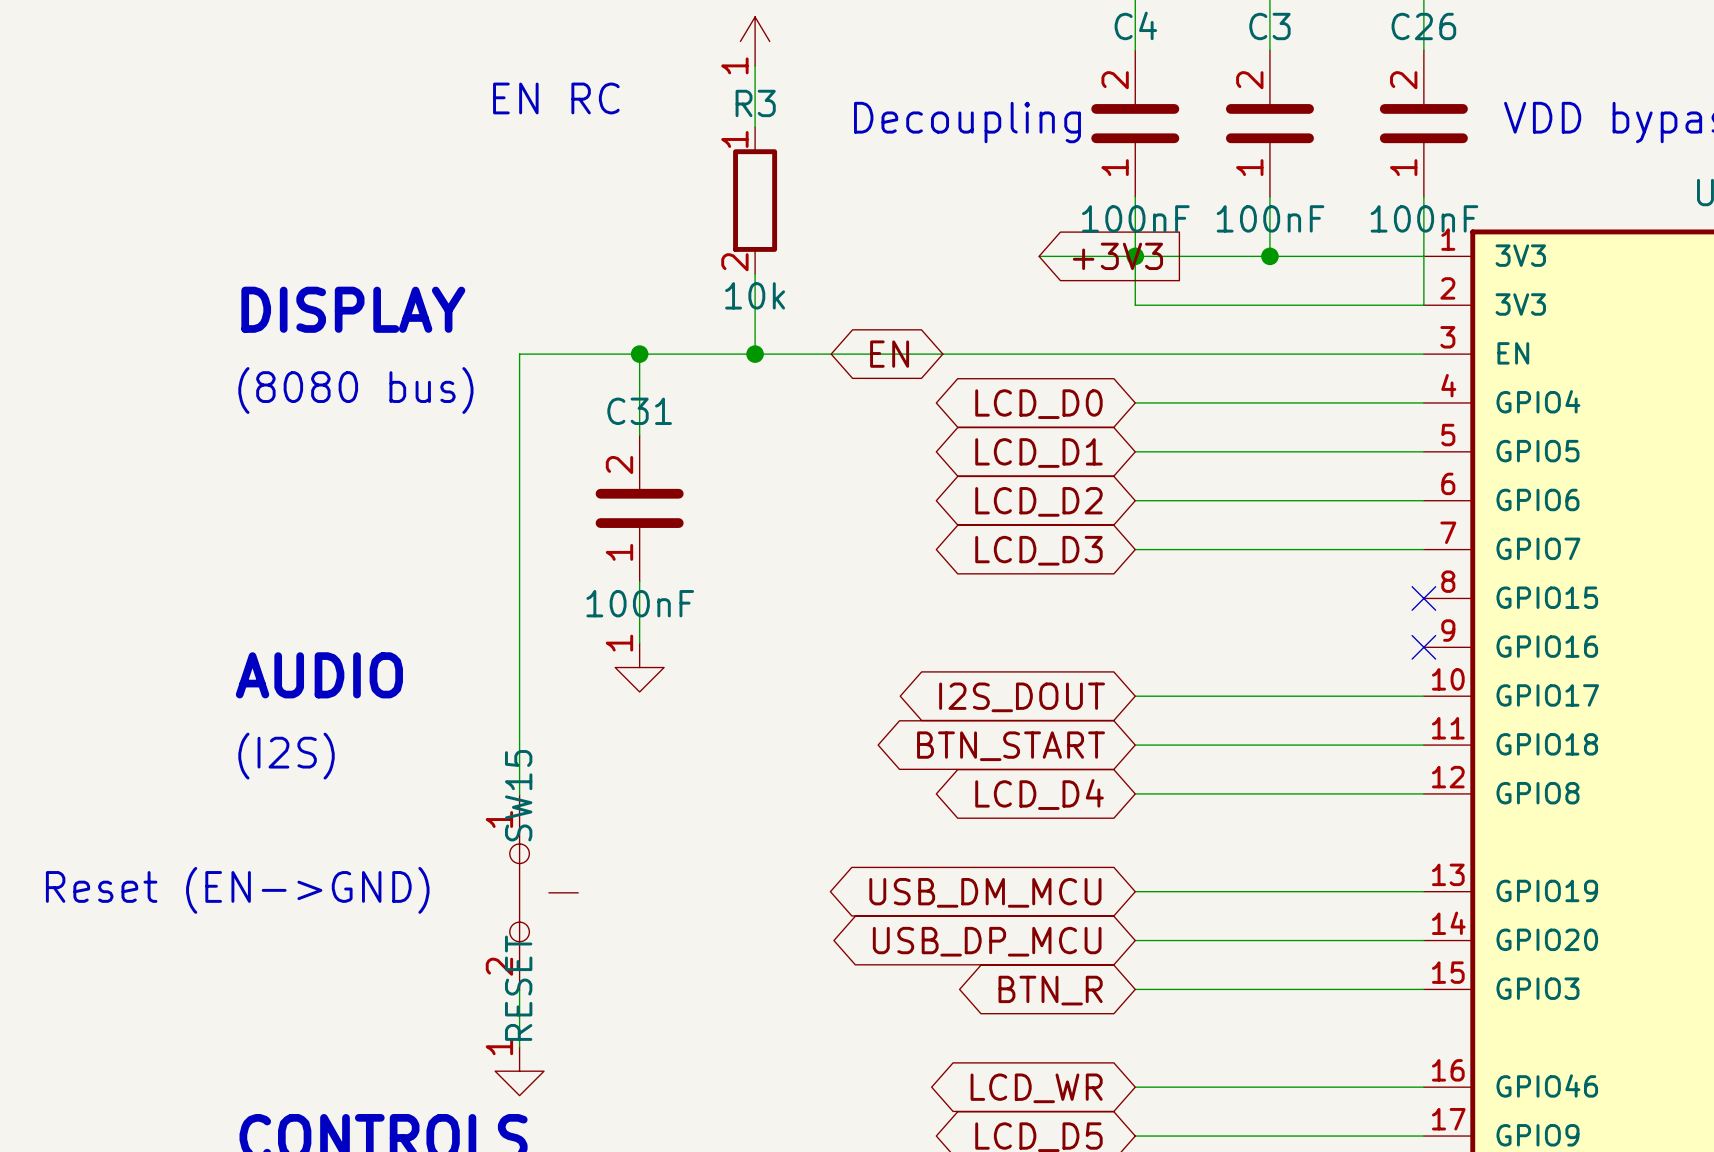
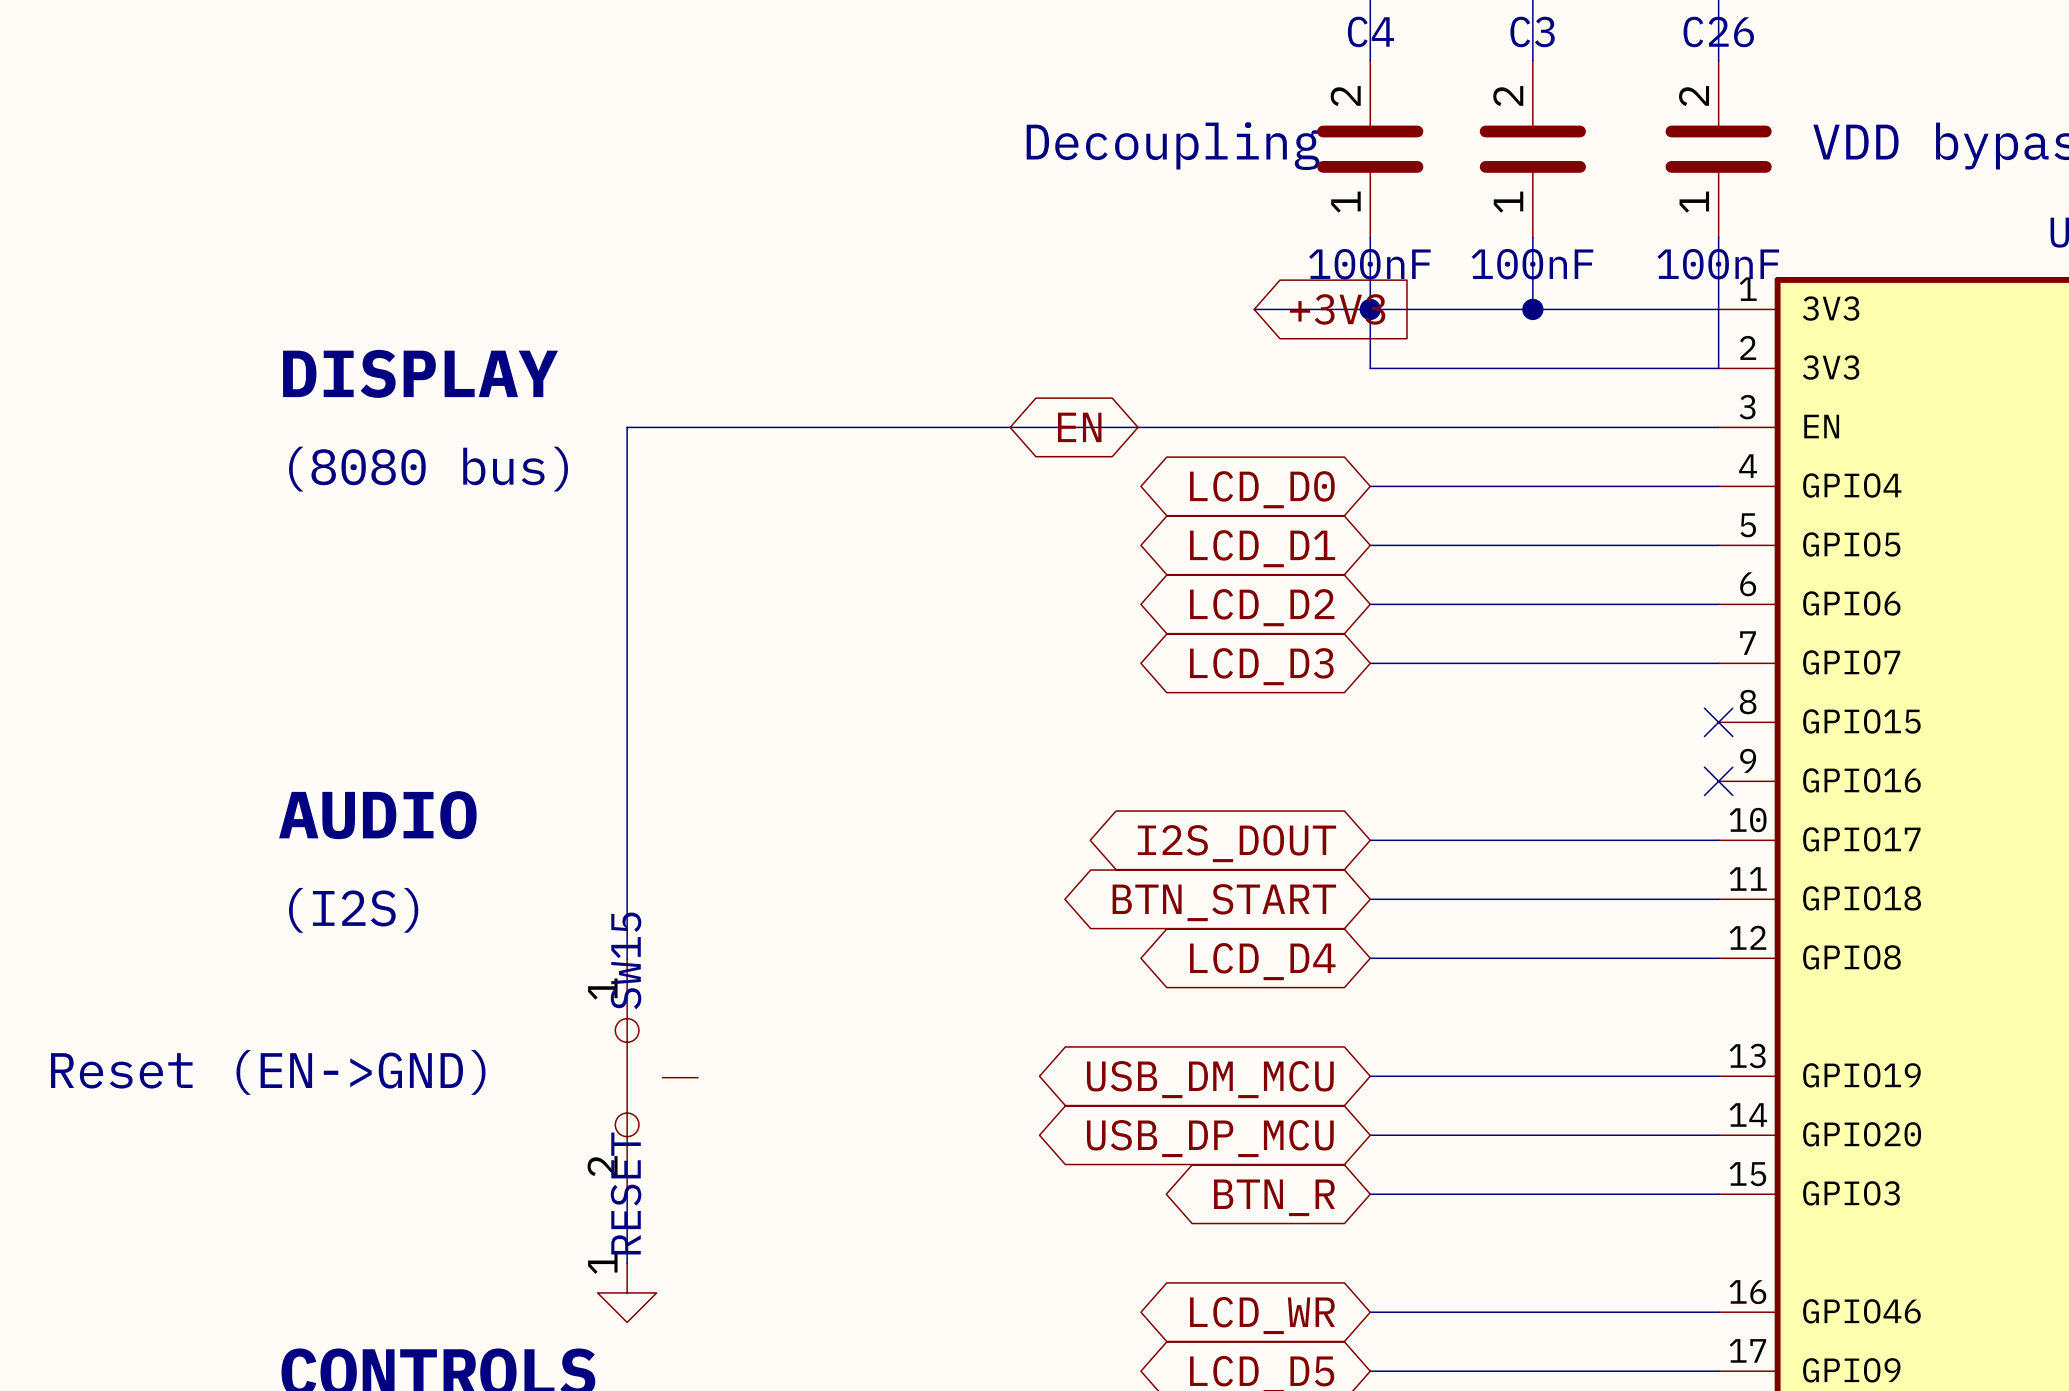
power symbol: (755, 41) -> none
wire: (755, 65) (755, 127) -> none
text: EN RC (556, 98) -> none
R3: 10k (755, 200) -> none
wire: (755, 273) (755, 354) -> none
wire: (639, 354) (639, 435) -> none
junction: (639, 354) -> none
junction: (755, 354) -> none
C31: 100nF (639, 508) -> none
wire: (639, 581) (639, 643) -> none
power symbol: (639, 667) -> none

